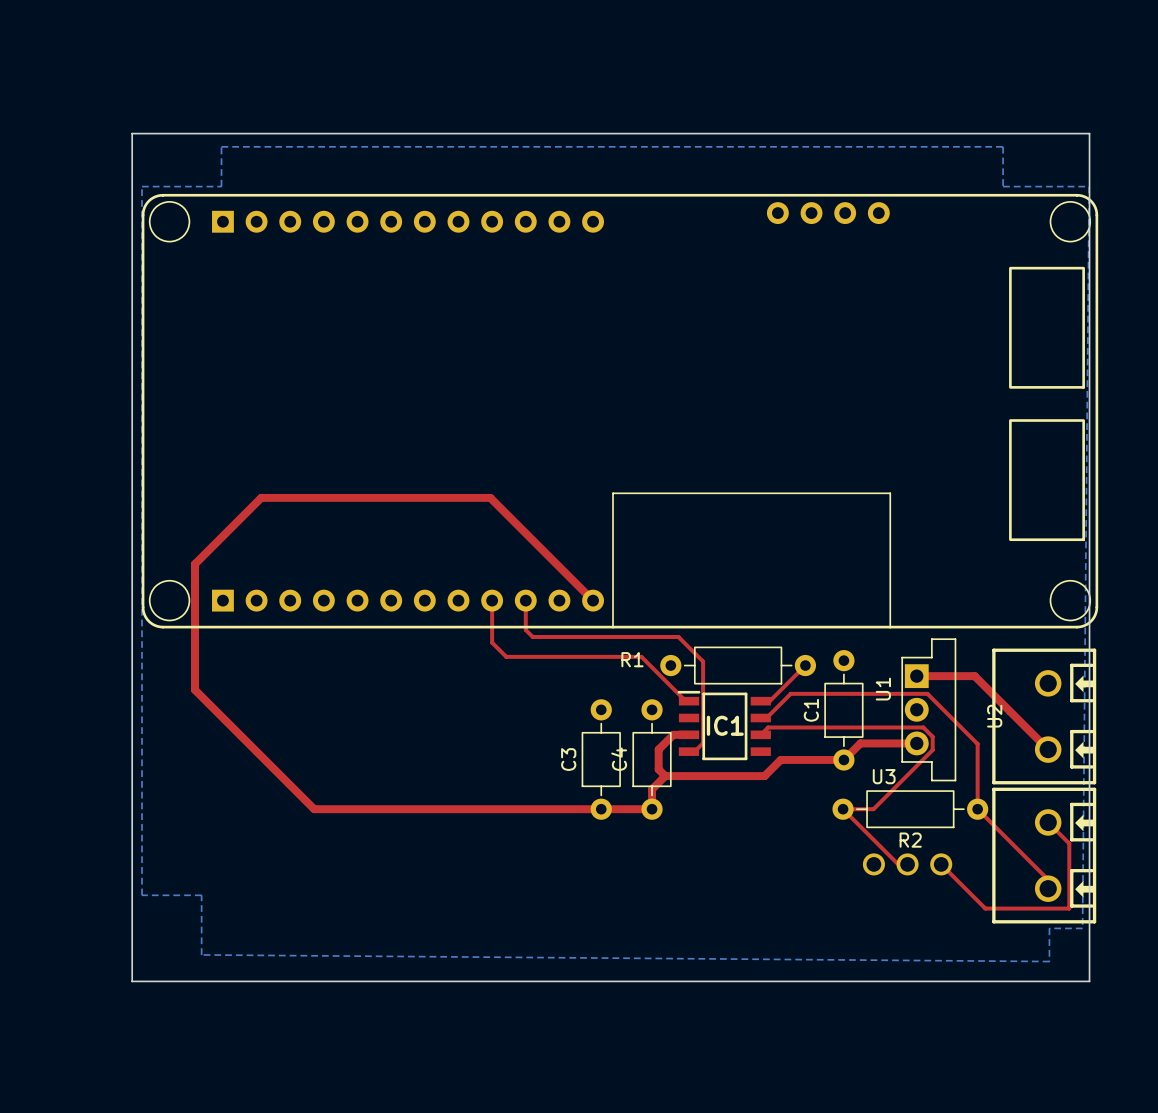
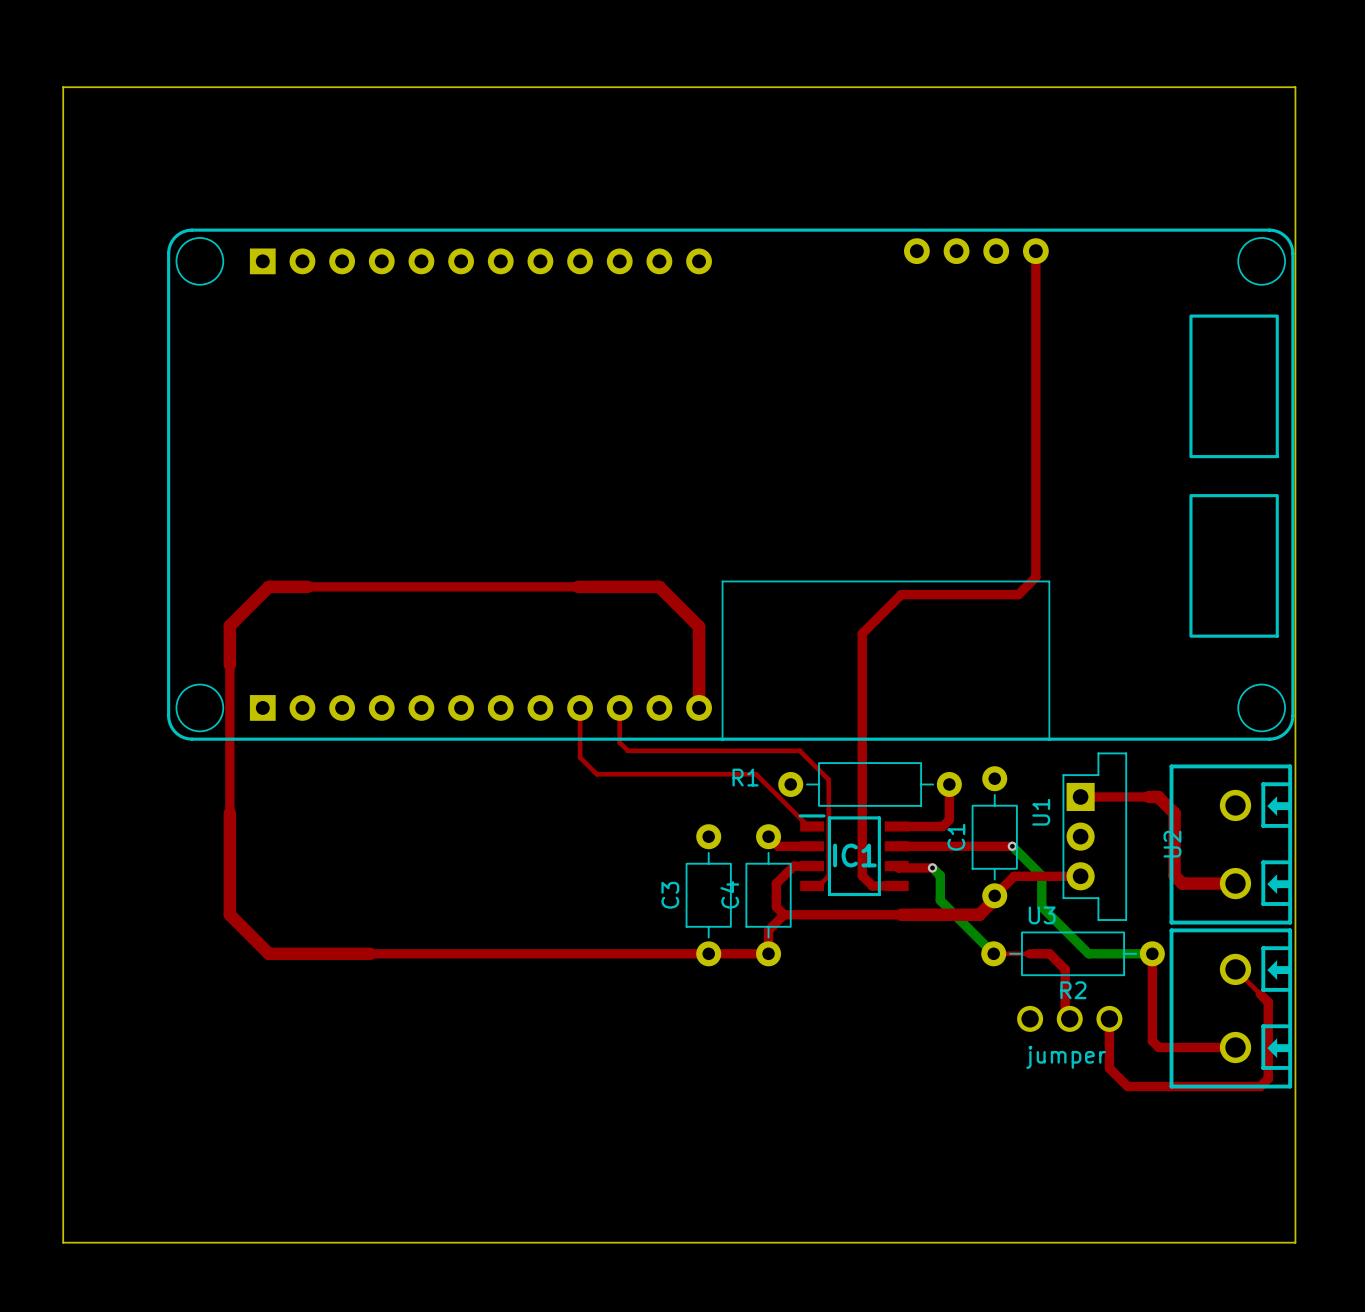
board edge: (132, 133) (1089, 133) (1089, 981) (132, 981) (132, 133) -> (63, 87) (63, 1242) (1295, 1242) (1295, 87) (63, 87)
bottom zone outline: (221, 146) (221, 186) (142, 186) (142, 895) (201, 895) (201, 954) (1049, 961) (1049, 928) (1082, 928) (1089, 186) (1003, 186) (1003, 146) (221, 146) -> none
top track: none -> (1035, 251) (1035, 577) (1018, 594) (901, 594) (862, 633) (862, 875) (872, 885) (896, 885)
top track: (261, 497) (195, 564) -> (307, 586) (268, 586) (229, 625) (229, 664)
top track: (490, 497) (593, 600) -> (577, 586) (659, 586) (699, 626) (699, 707)
top track: (805, 665) (769, 701) -> (949, 784) (949, 819) (942, 826) (907, 826)
top track: (974, 676) (1048, 749) -> (1148, 796) (1158, 796) (1174, 813) (1174, 875) (1182, 883) (1235, 882)
top track: (195, 689) (314, 809) -> (229, 813) (229, 914) (268, 953) (370, 953)
top track: none -> (768, 836) (778, 846) (812, 846)
top track: none -> (896, 846) (1012, 846)
top track: (766, 717) (790, 693) (927, 693) (977, 744) (977, 809) (1048, 879) -> none
bottom track: none -> (1012, 846) (1041, 875) (1041, 906) (1088, 953) (1152, 953)
via: none -> (1012, 846)
top track: (760, 734) (768, 727) (923, 727) (932, 736) (932, 750) (873, 809) -> (896, 866) (898, 867) (932, 867)
bottom track: none -> (932, 867) (940, 875) (940, 900) (993, 953)
via: none -> (932, 867)
top track: (843, 759) (780, 759) (764, 776) -> (994, 895) (994, 899) (979, 914) (901, 914)
top track: (843, 809) (898, 864) -> none
top track: none -> (1029, 953) (1049, 953) (1065, 969) (1065, 1014) (1069, 1018)
top track: none -> (1152, 953) (1152, 1040) (1158, 1047) (1235, 1047)
top track: (1069, 843) (1069, 908) (985, 908) (941, 864) -> (1260, 994) (1268, 1002) (1268, 1078) (1260, 1086) (1127, 1086) (1109, 1068) (1109, 1018)
part text: none -> jumper (1066, 1057)

